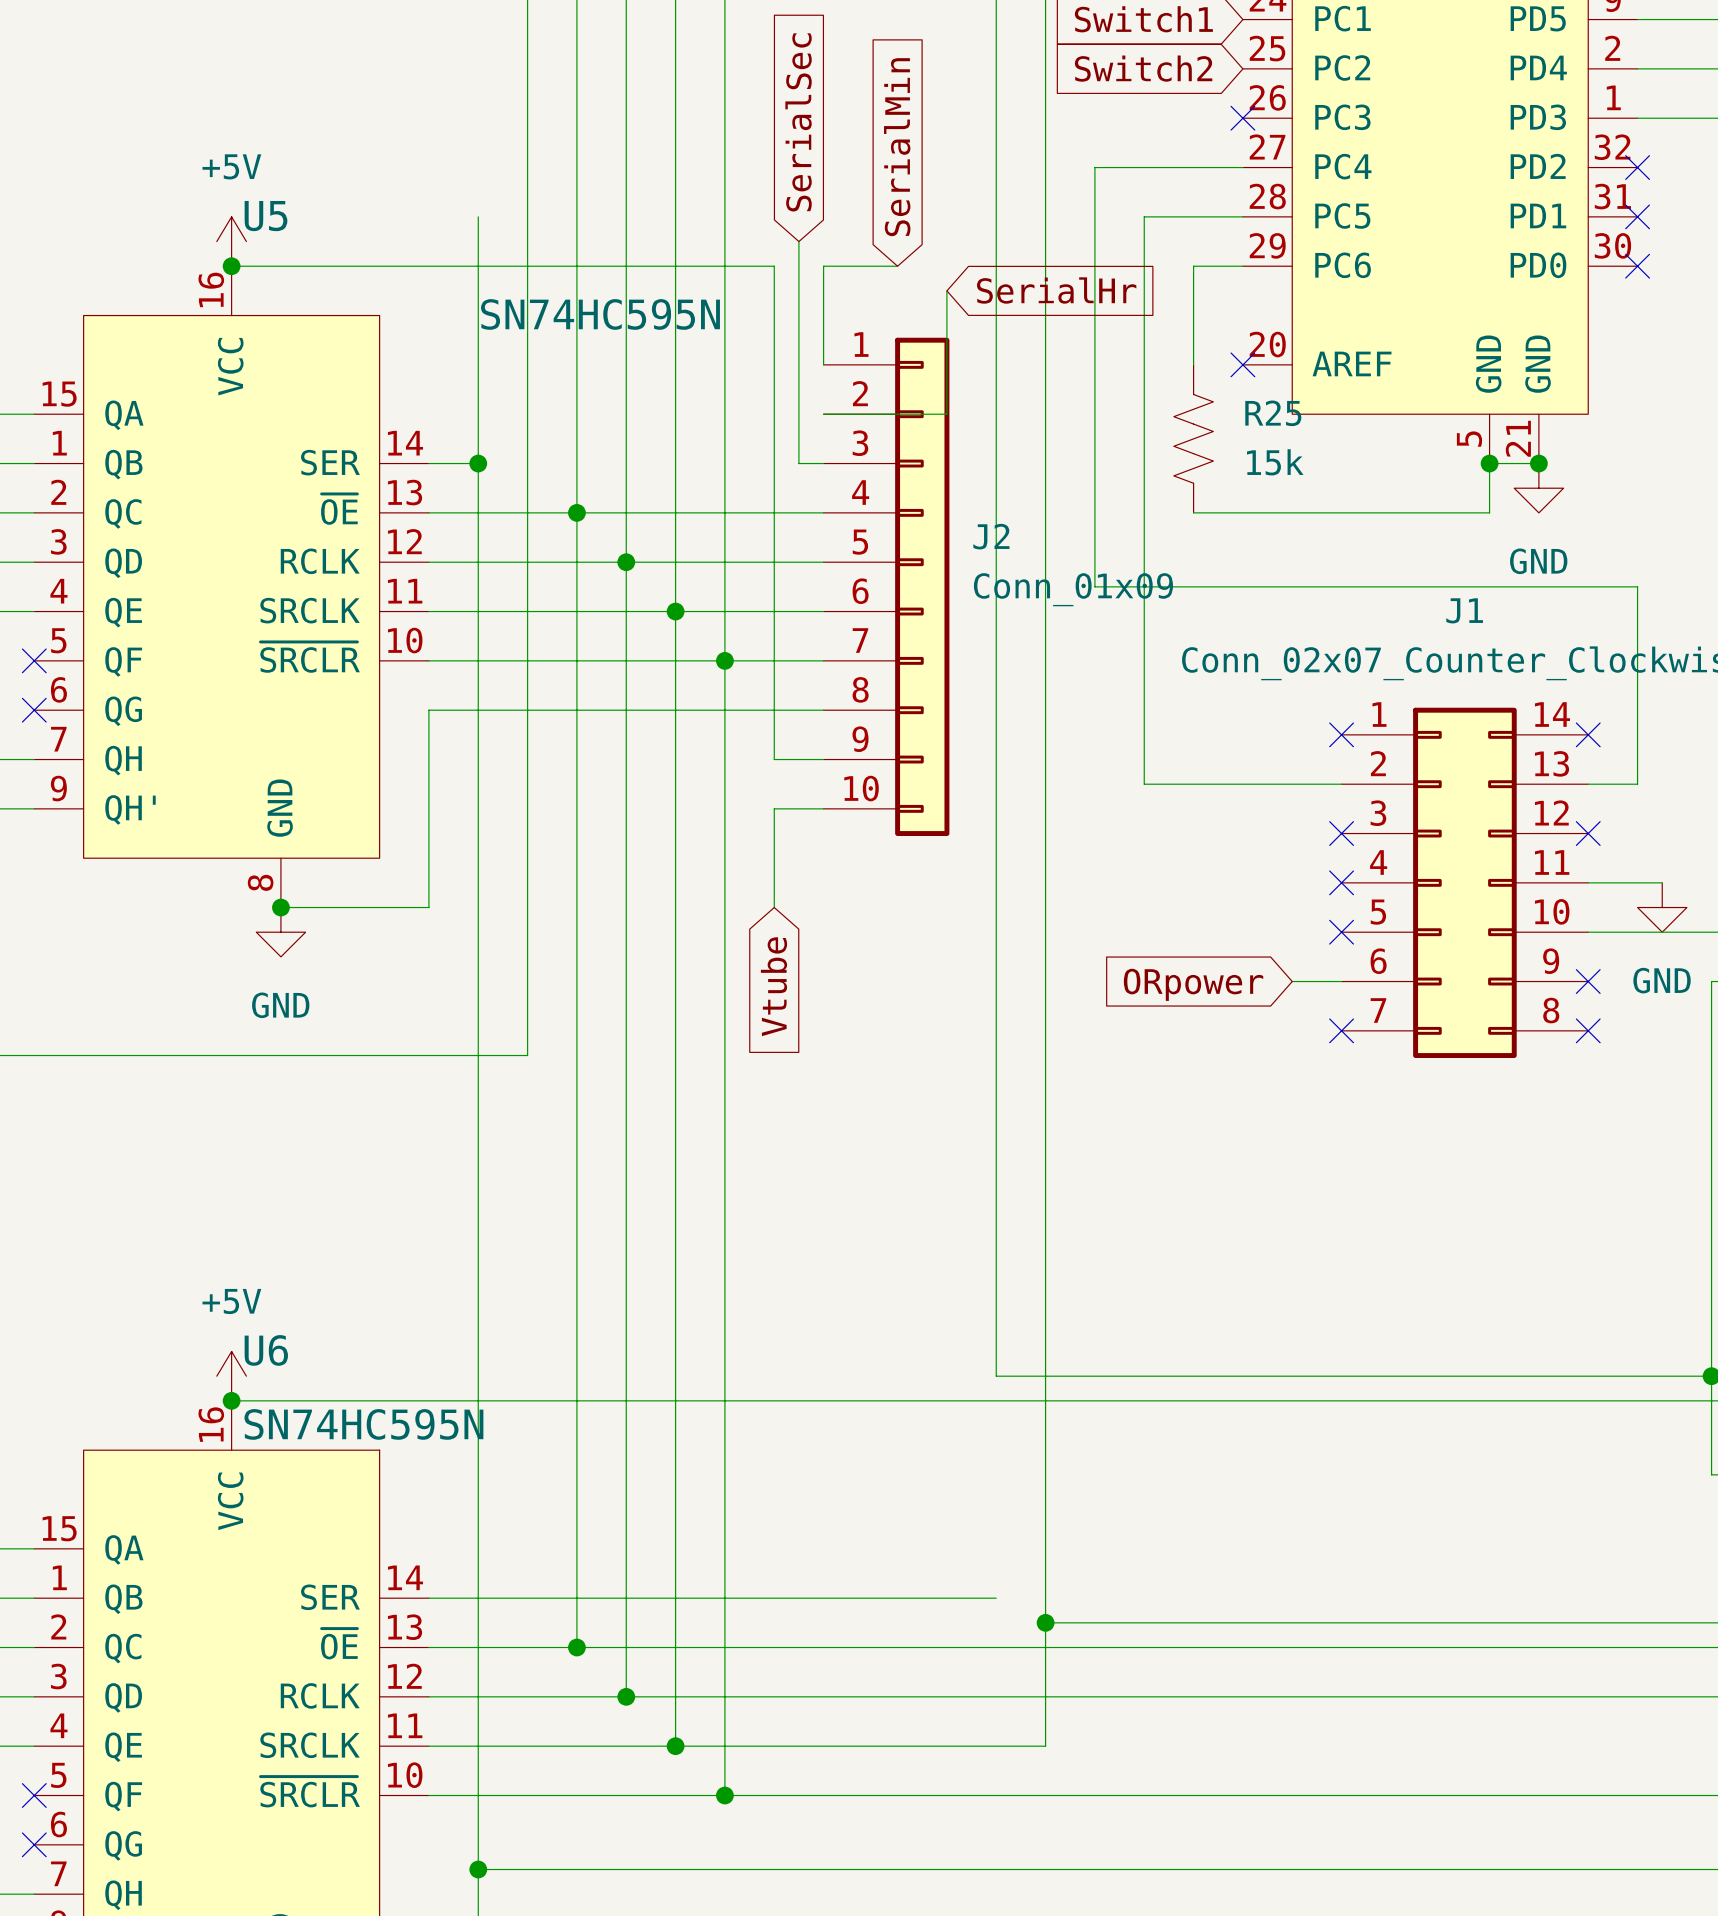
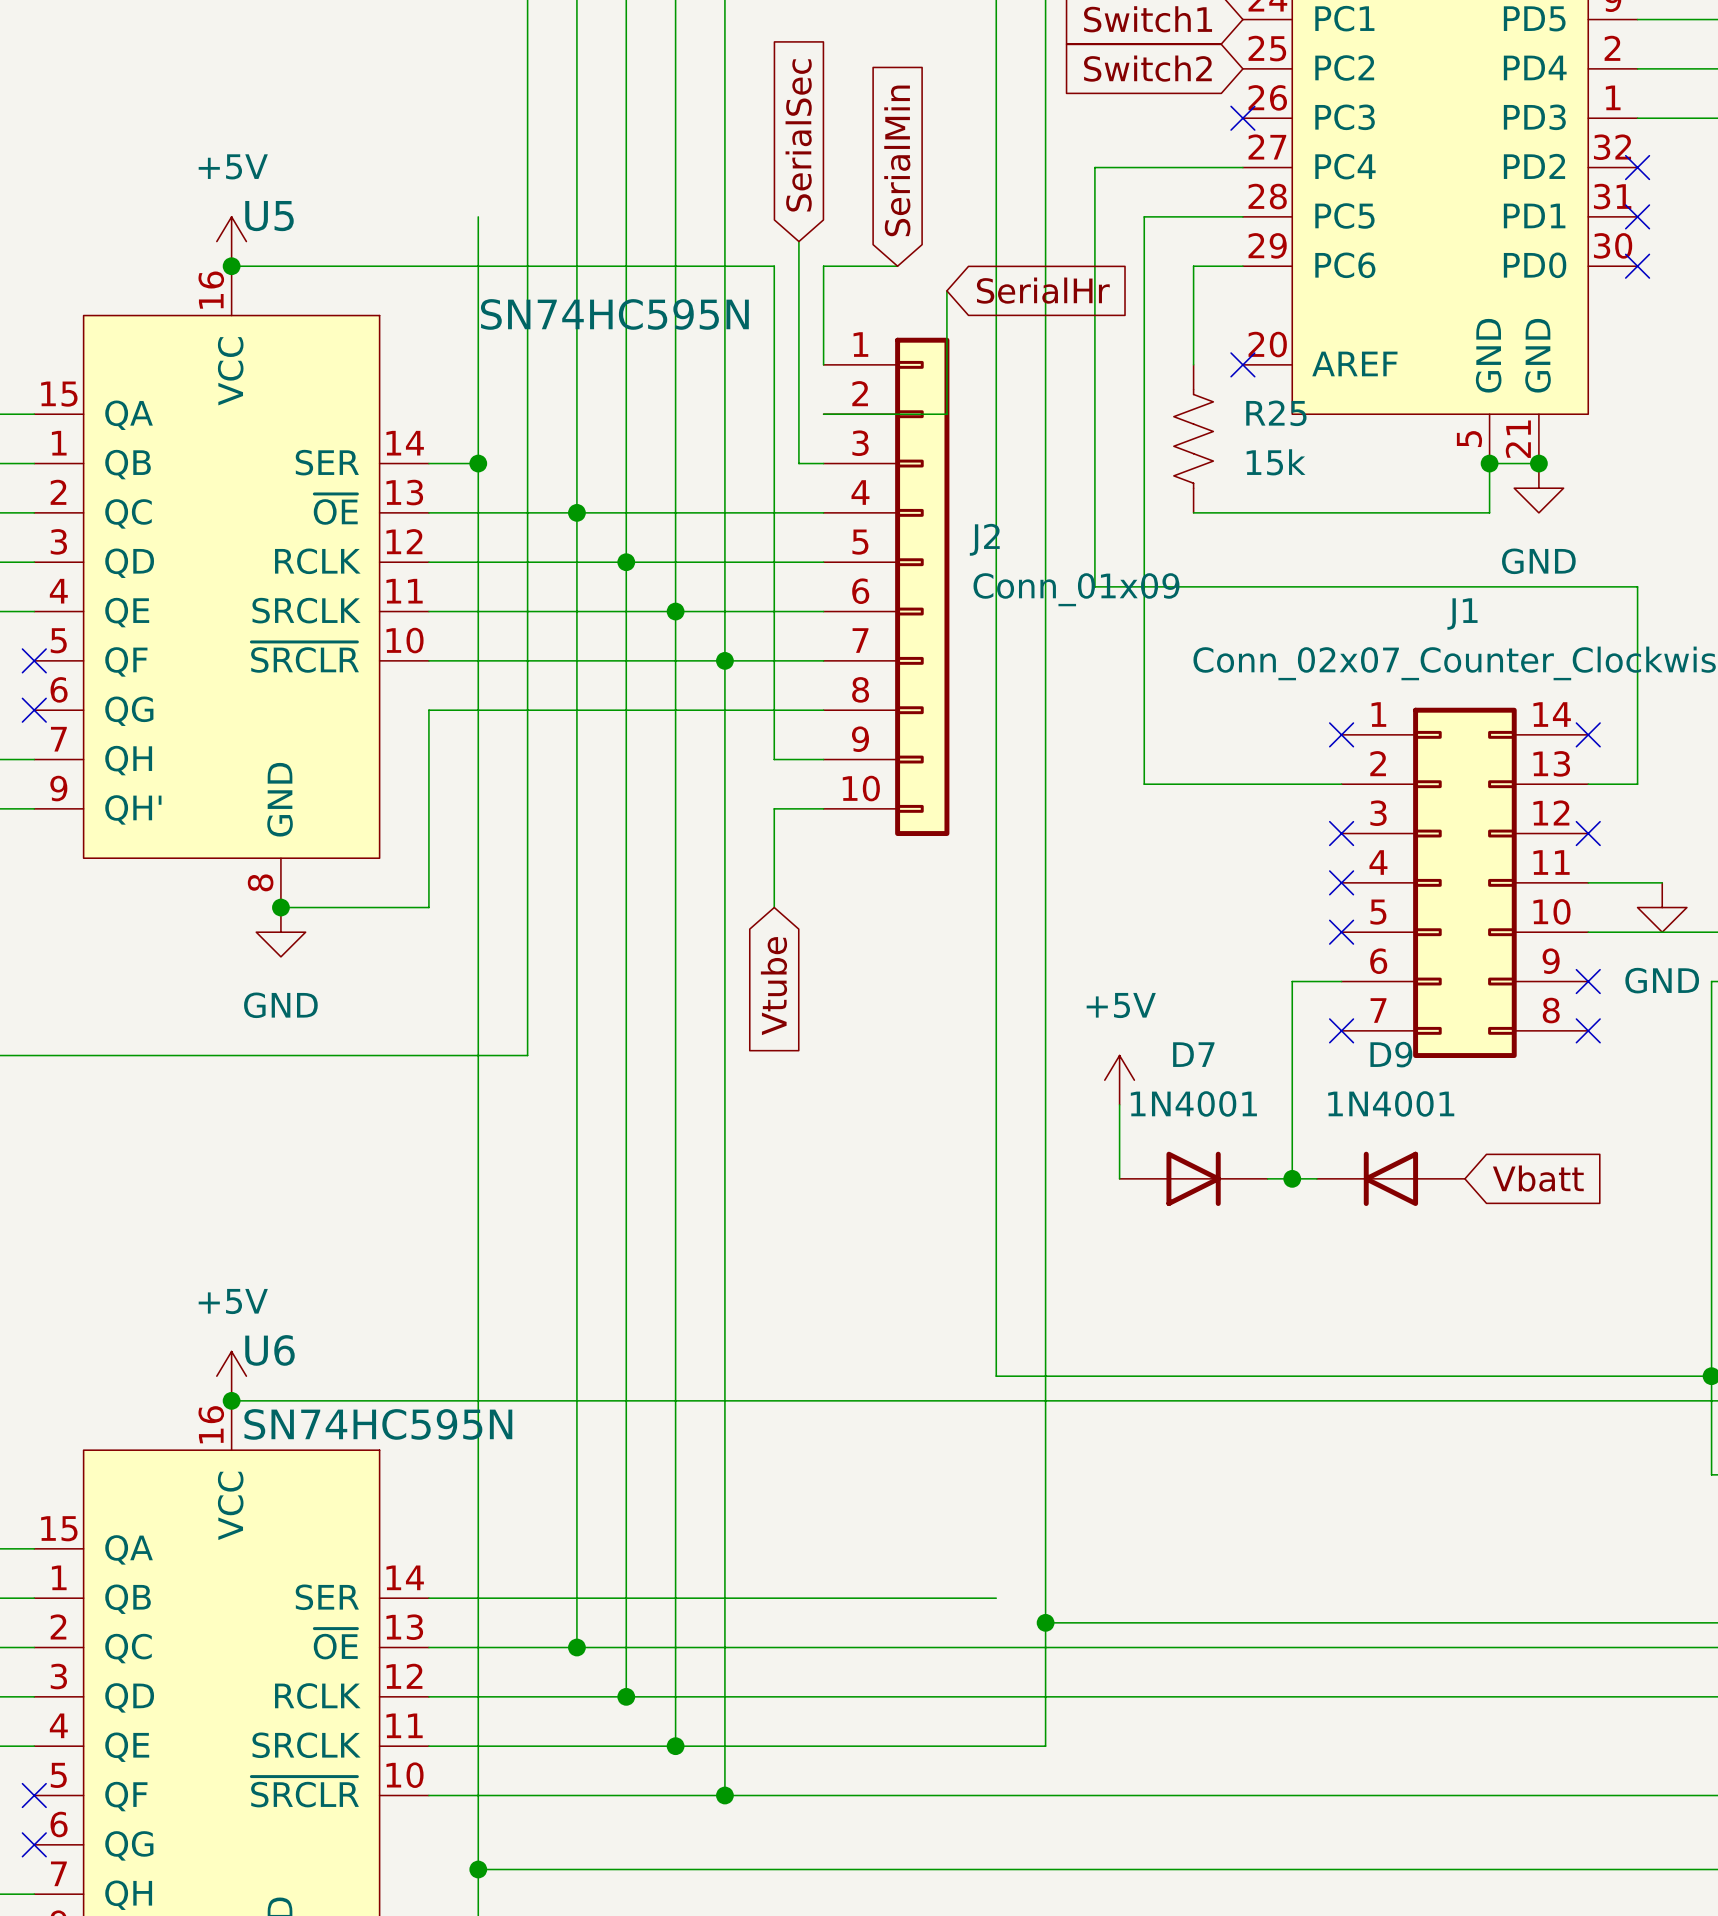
wire: none -> (1292, 981) (1292, 1178)
global label: ORpower (1193, 984) -> none
power symbol: none -> +5V (1119, 1080)
wire: none -> (1119, 1104) (1119, 1178)
D7: none -> 1N4001 (1193, 1178)
wire: none -> (1267, 1178) (1316, 1178)
junction: none -> (1292, 1178)
D9: none -> 1N4001 (1390, 1178)
global label: none -> Vbatt (1538, 1178)

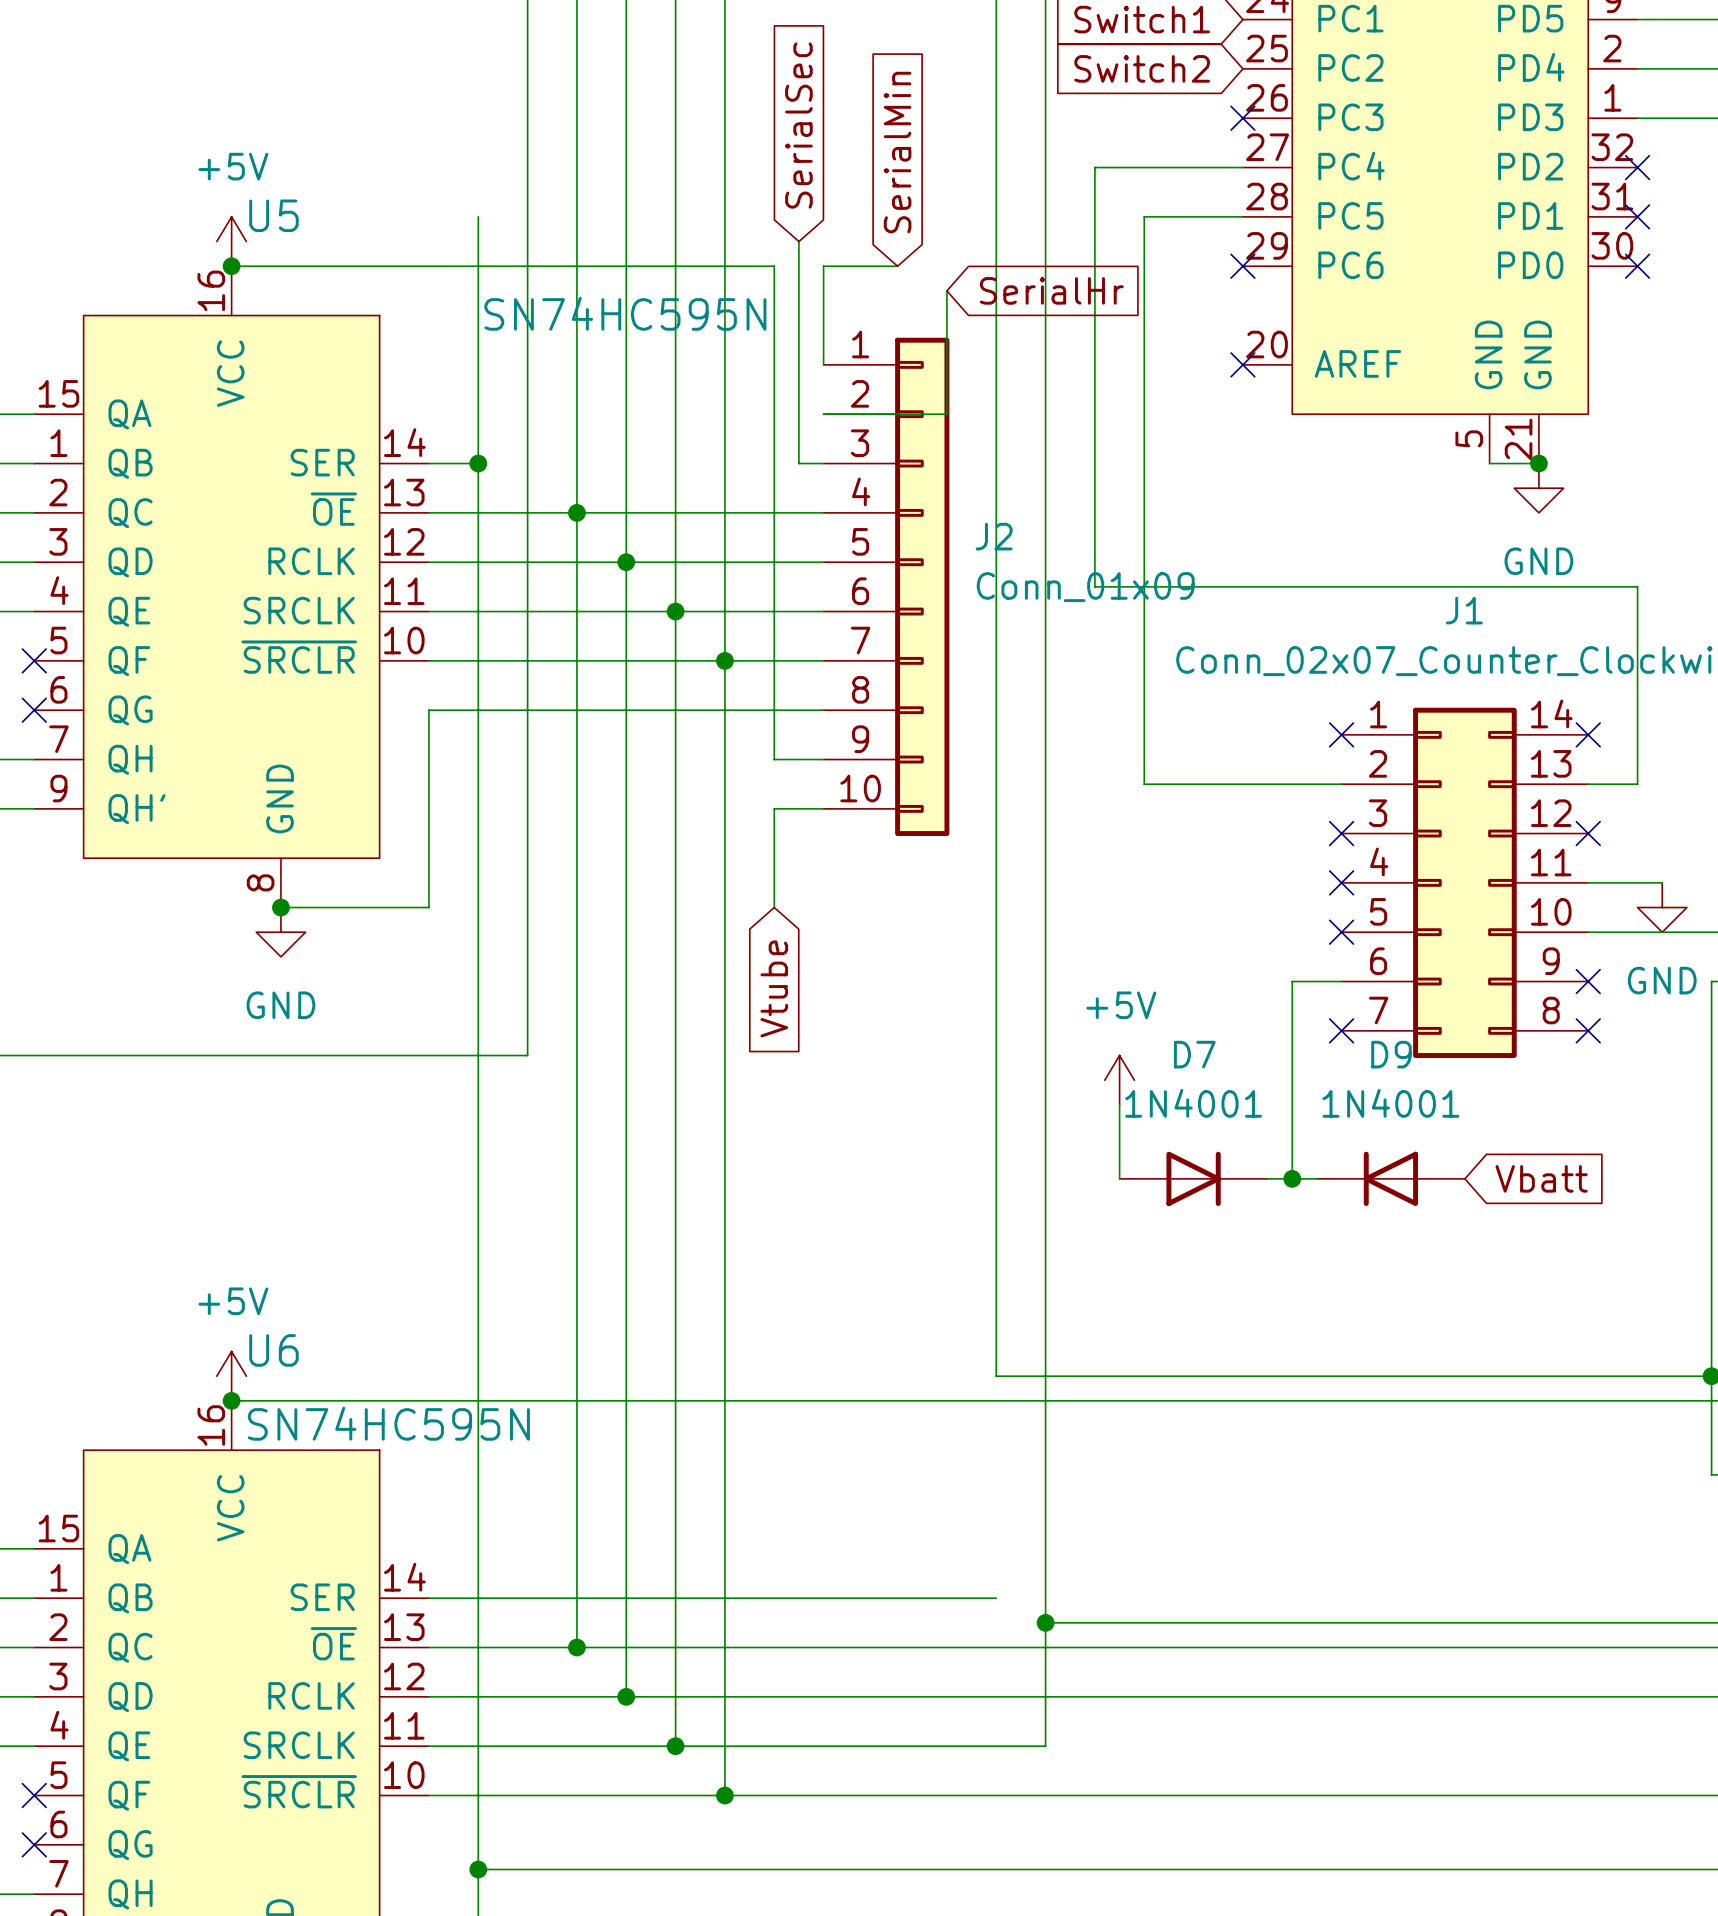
wire: (1242, 266) (1193, 266) (1193, 364) -> none
no-connect mark: none -> (1242, 266)
R25: 15k (1193, 438) -> none
wire: (1489, 463) (1489, 512) (1193, 512) -> none
junction: (1489, 463) -> none

